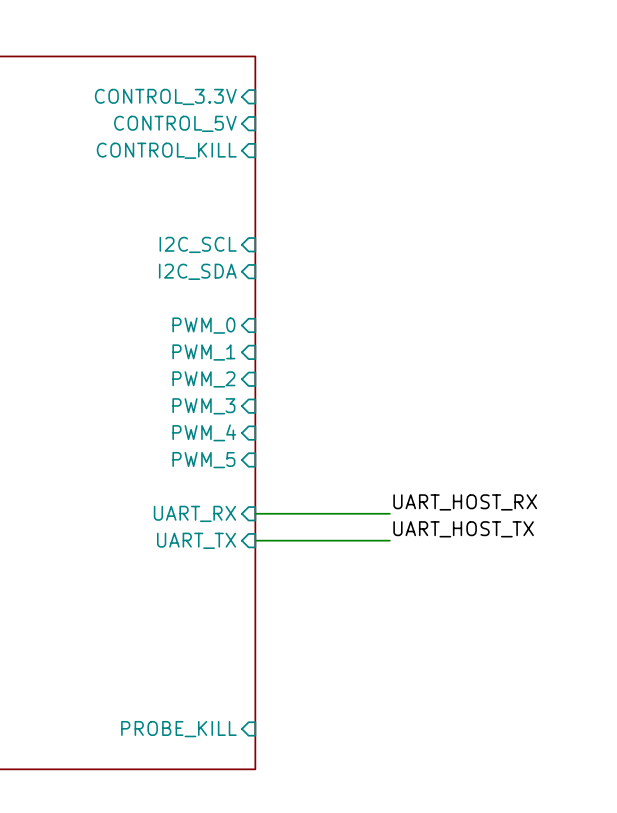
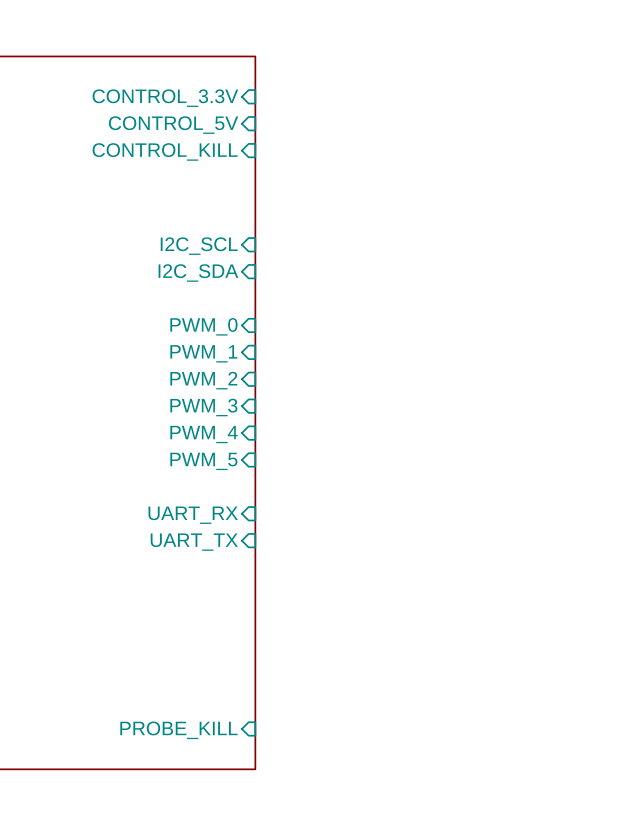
label: UART_HOST_RX (465, 502) -> none
wire: (255, 513) (389, 513) -> none
label: UART_HOST_TX (463, 529) -> none
wire: (255, 540) (389, 540) -> none

